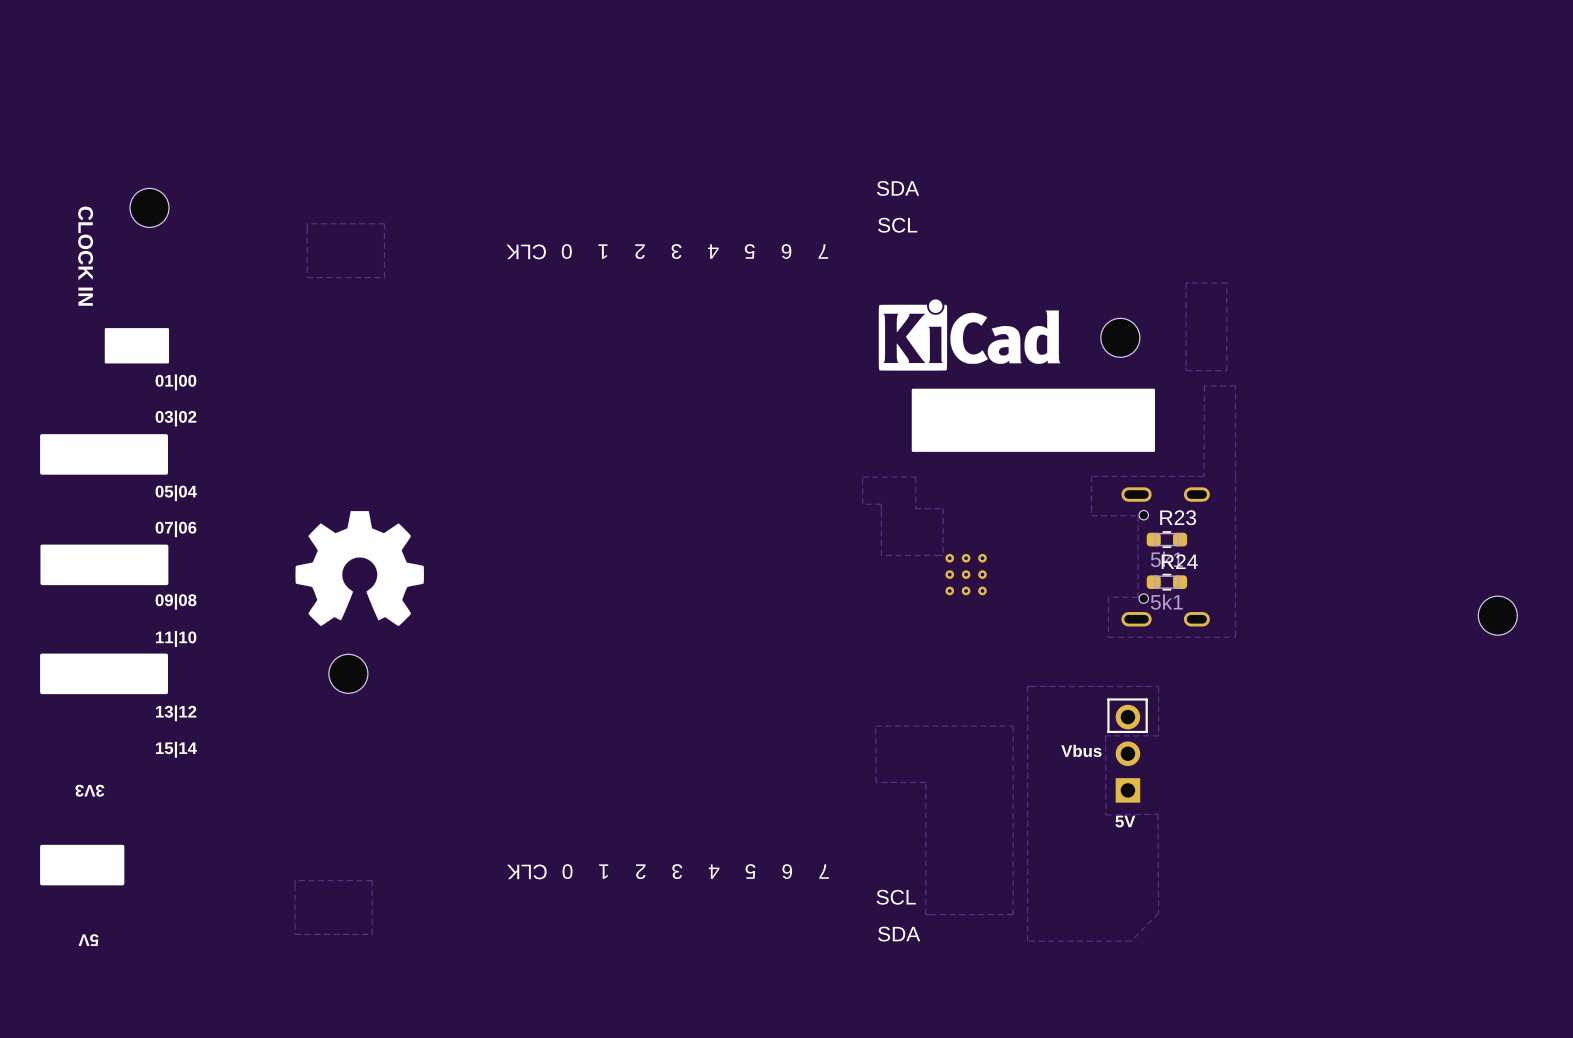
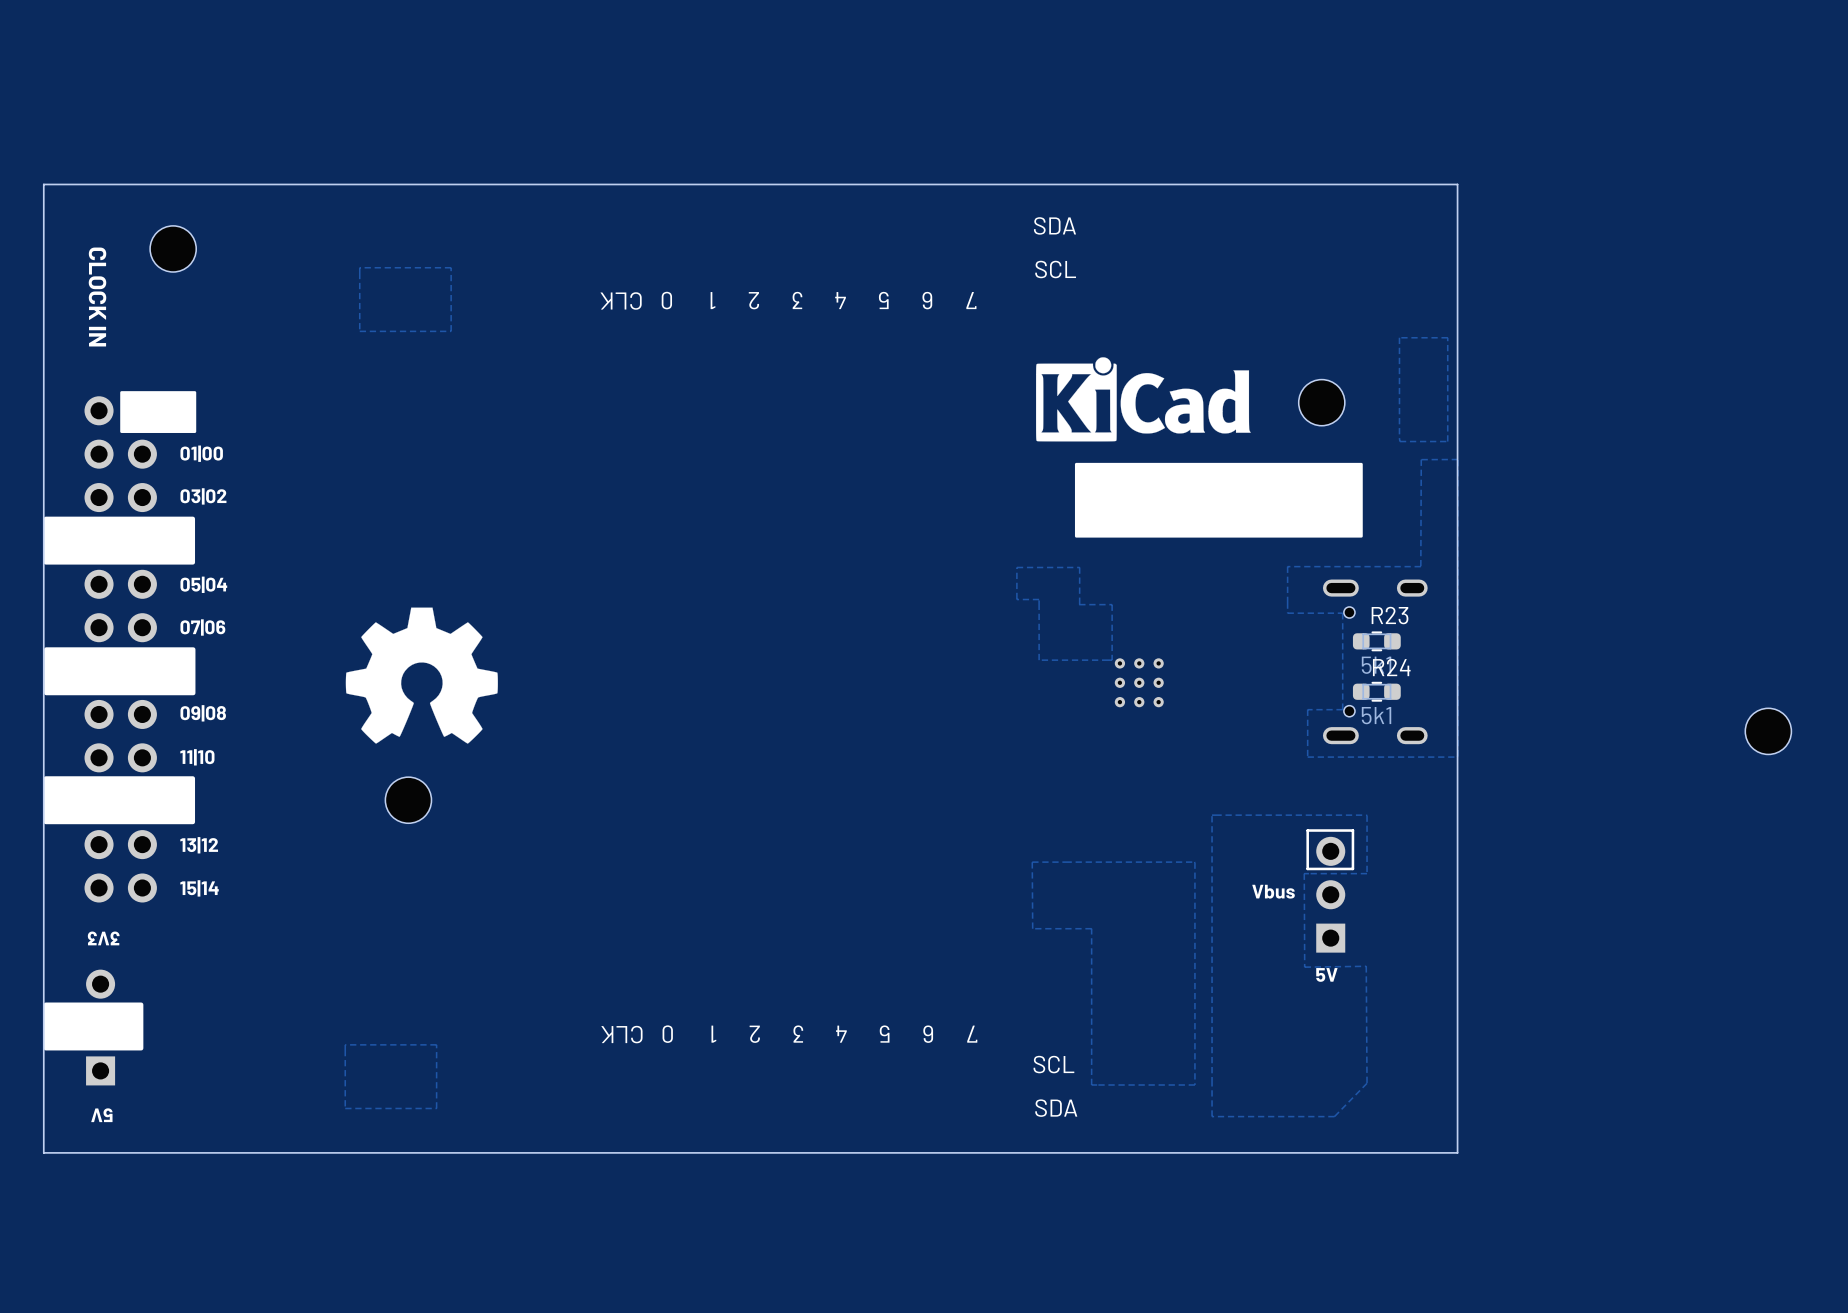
board edge: none -> (1457, 184) (43, 184) (43, 1152) (1457, 1152) (1457, 184)
part: none -> (120, 649)
part: none -> (100, 1027)

